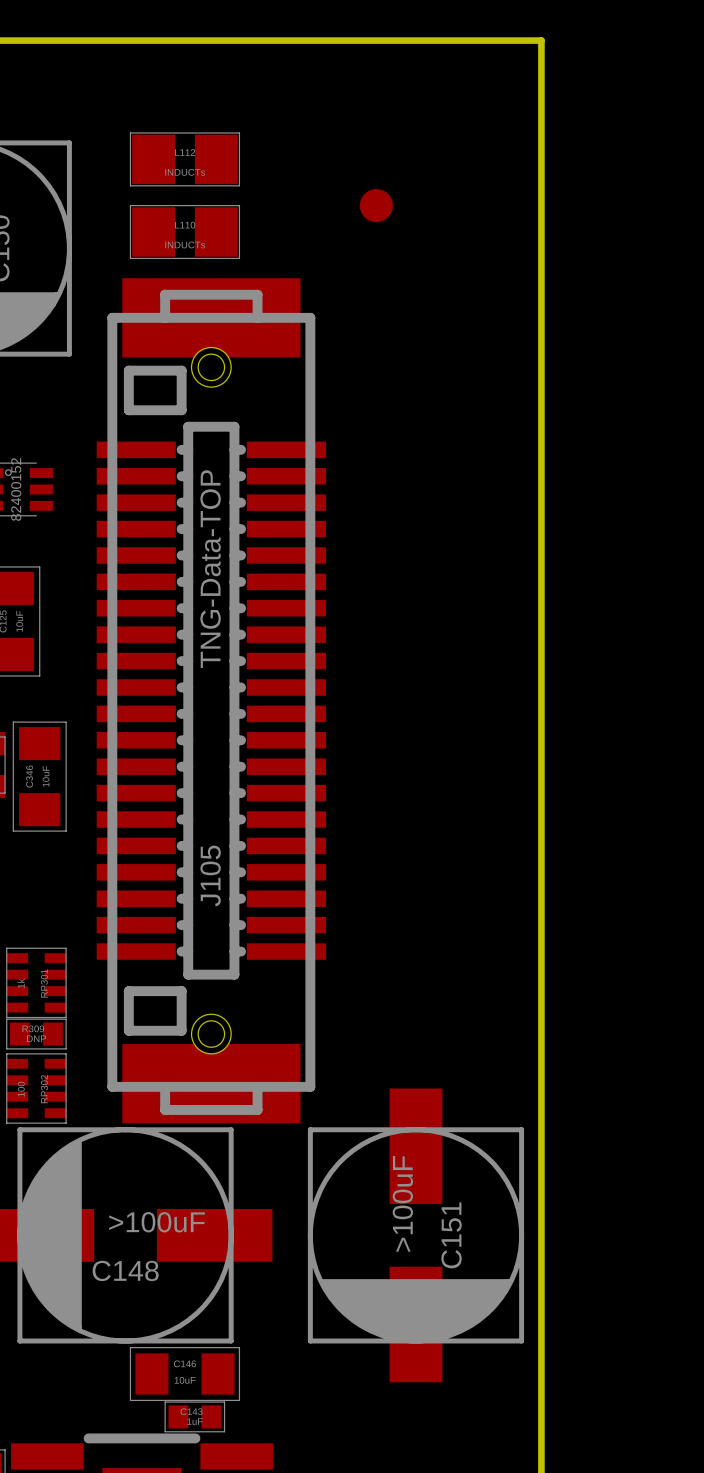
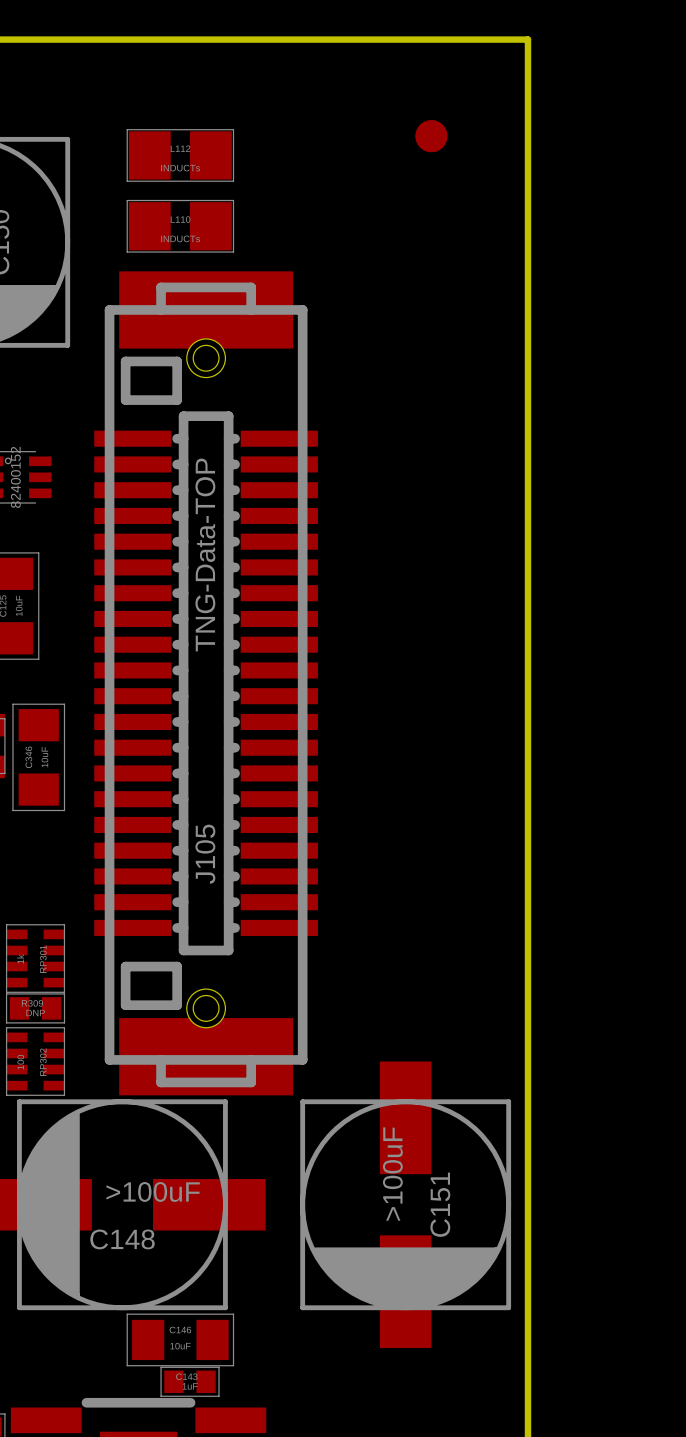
part position: (376, 205) -> (431, 136)

